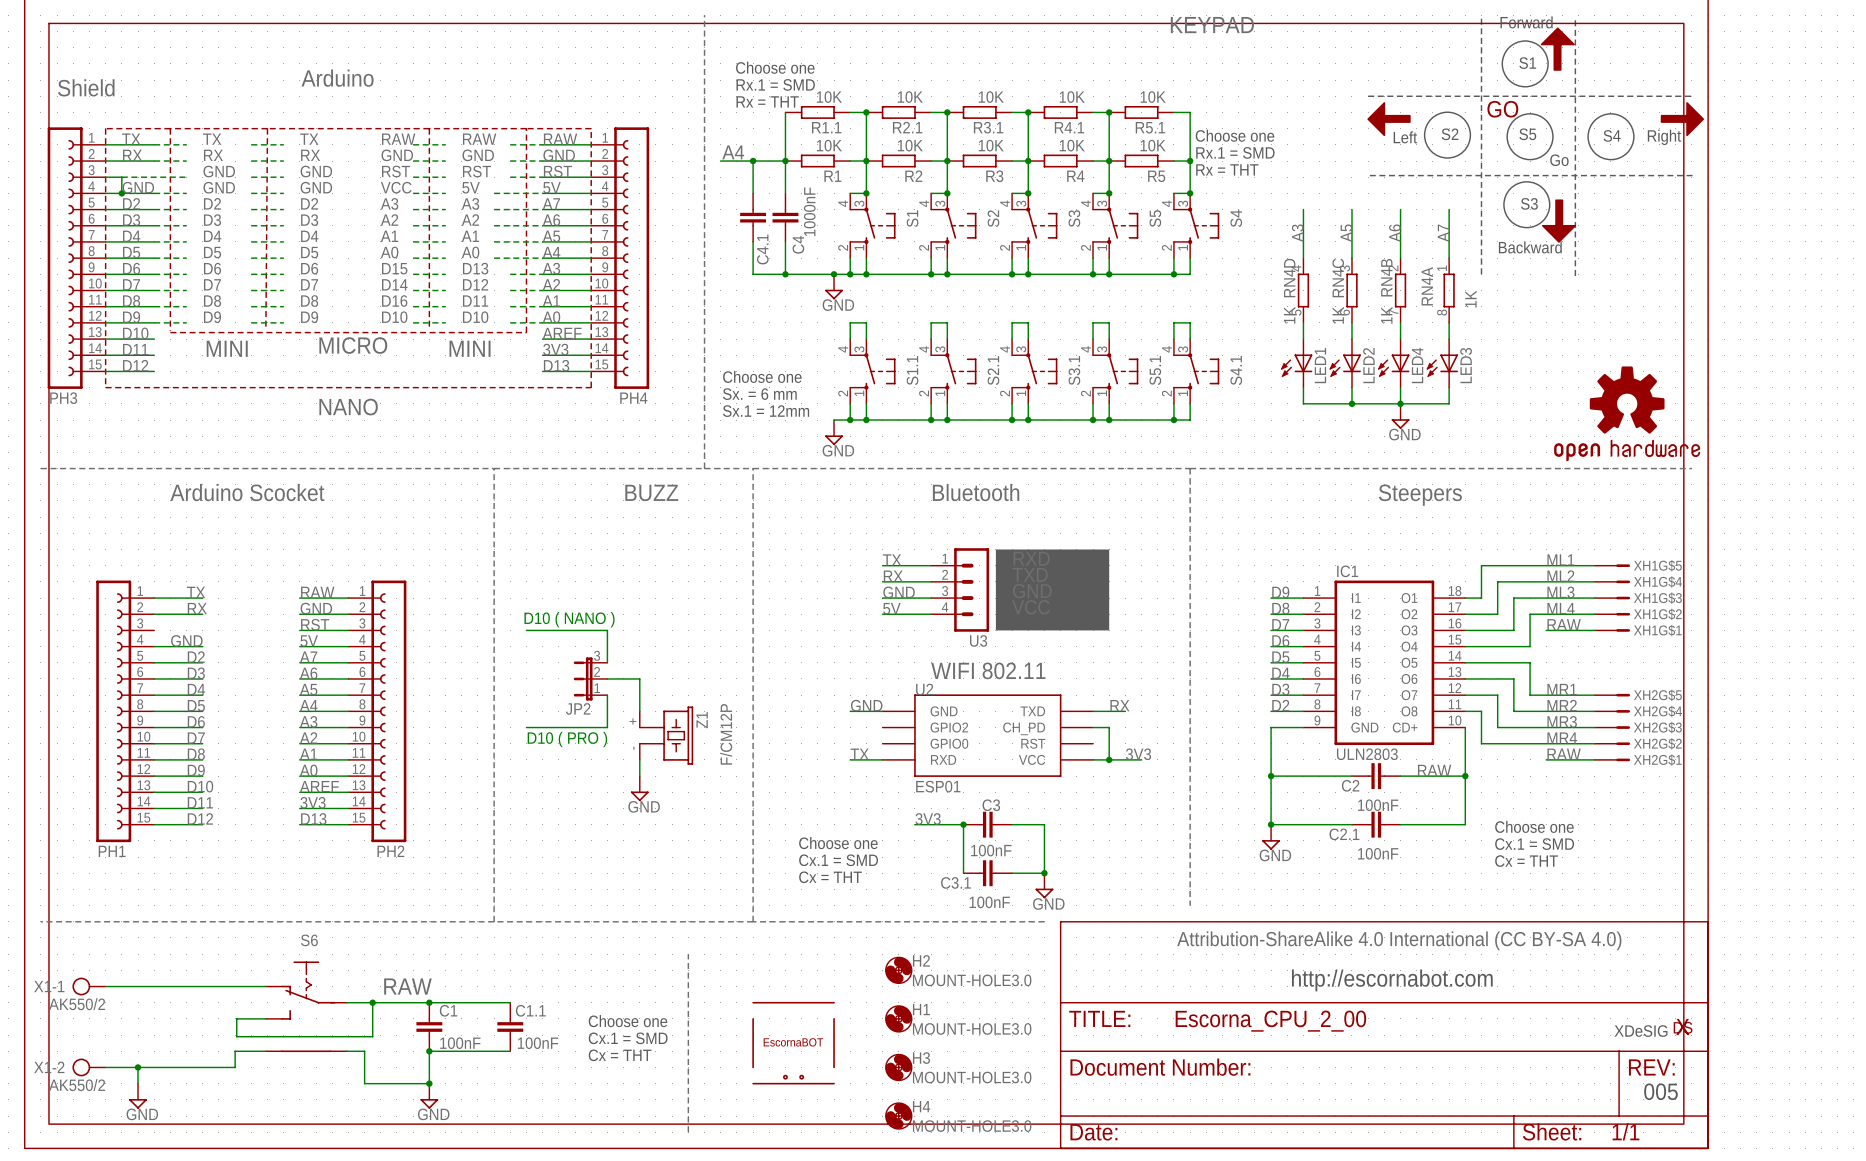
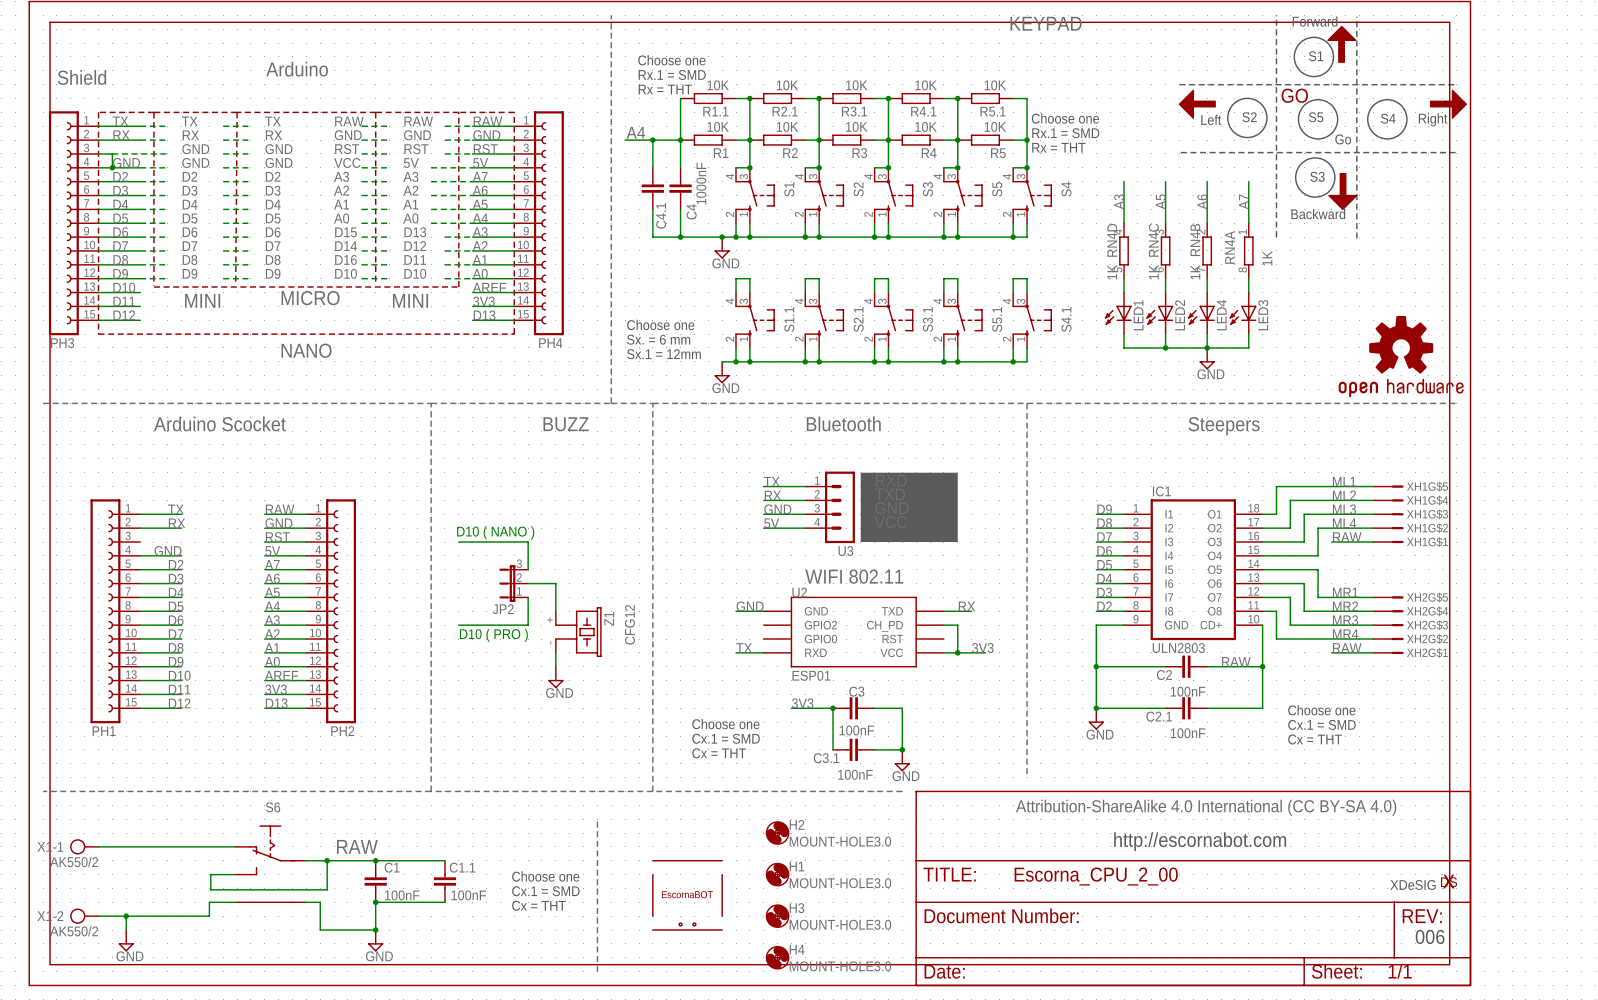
Z1 value: F/CM12P (726, 734) -> CFG12 (629, 624)
text: 005 (1660, 1091) -> 006 (1430, 936)

